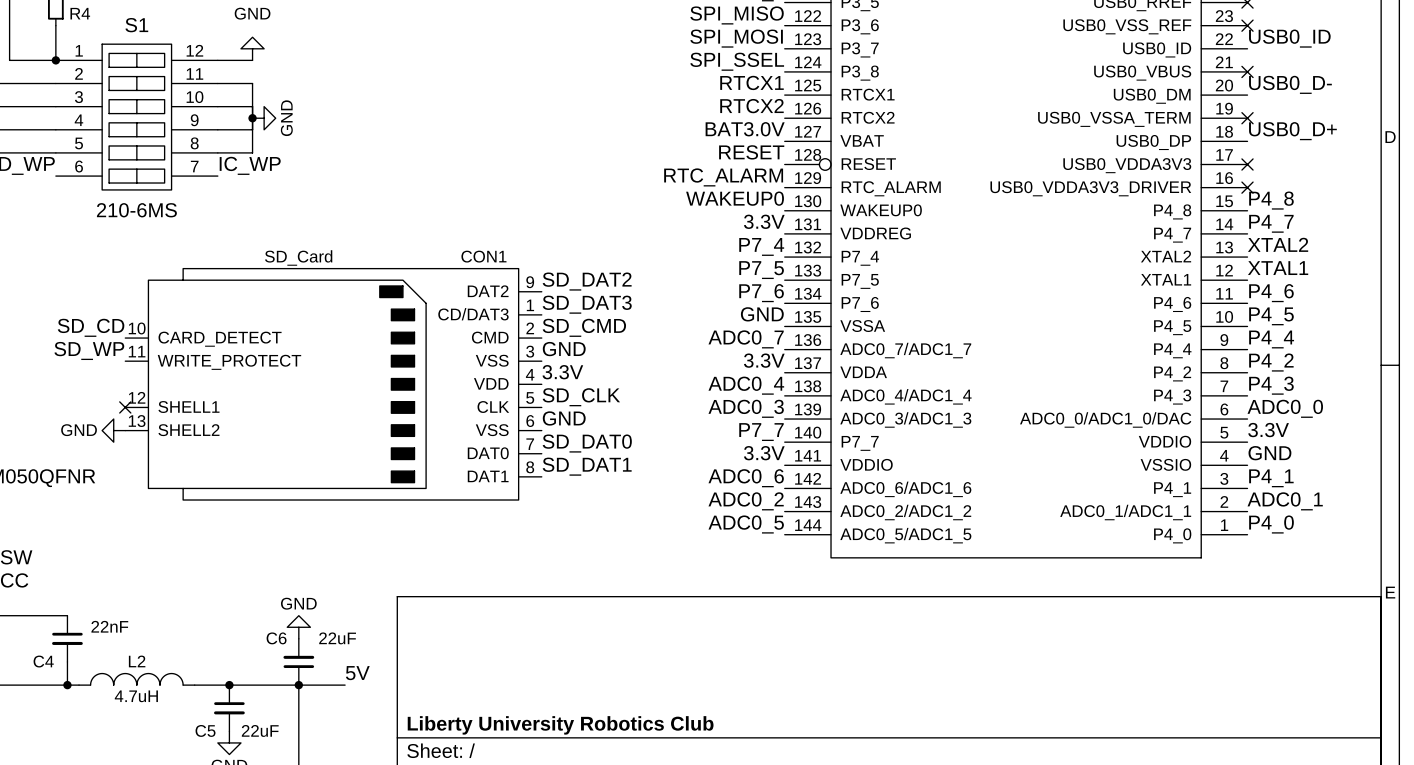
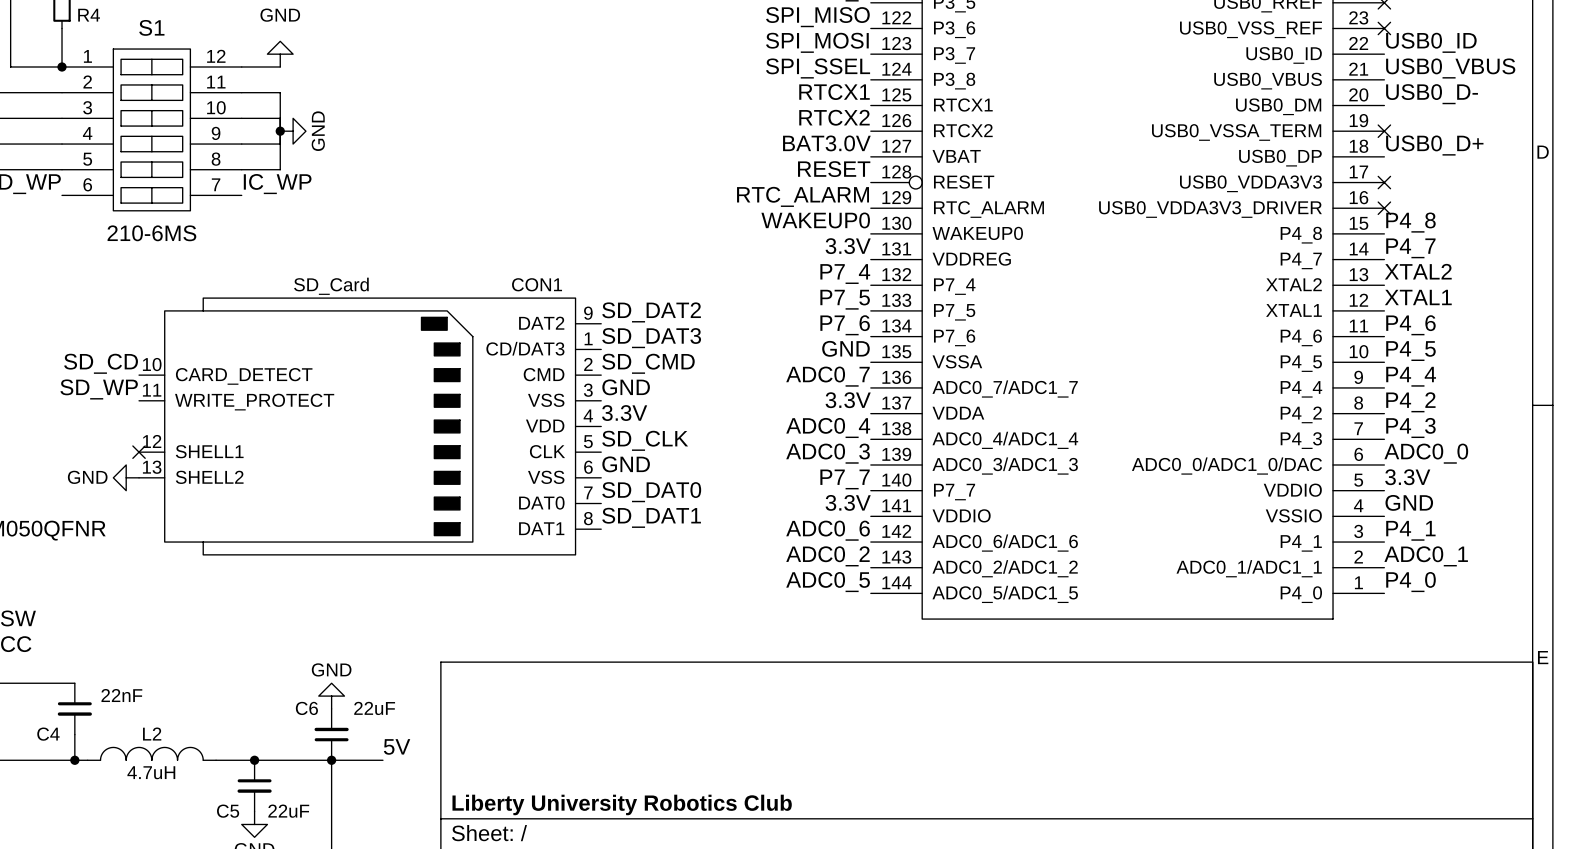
label: none -> USB0_VBUS (1450, 68)
no-connect mark: (1247, 71) -> none

